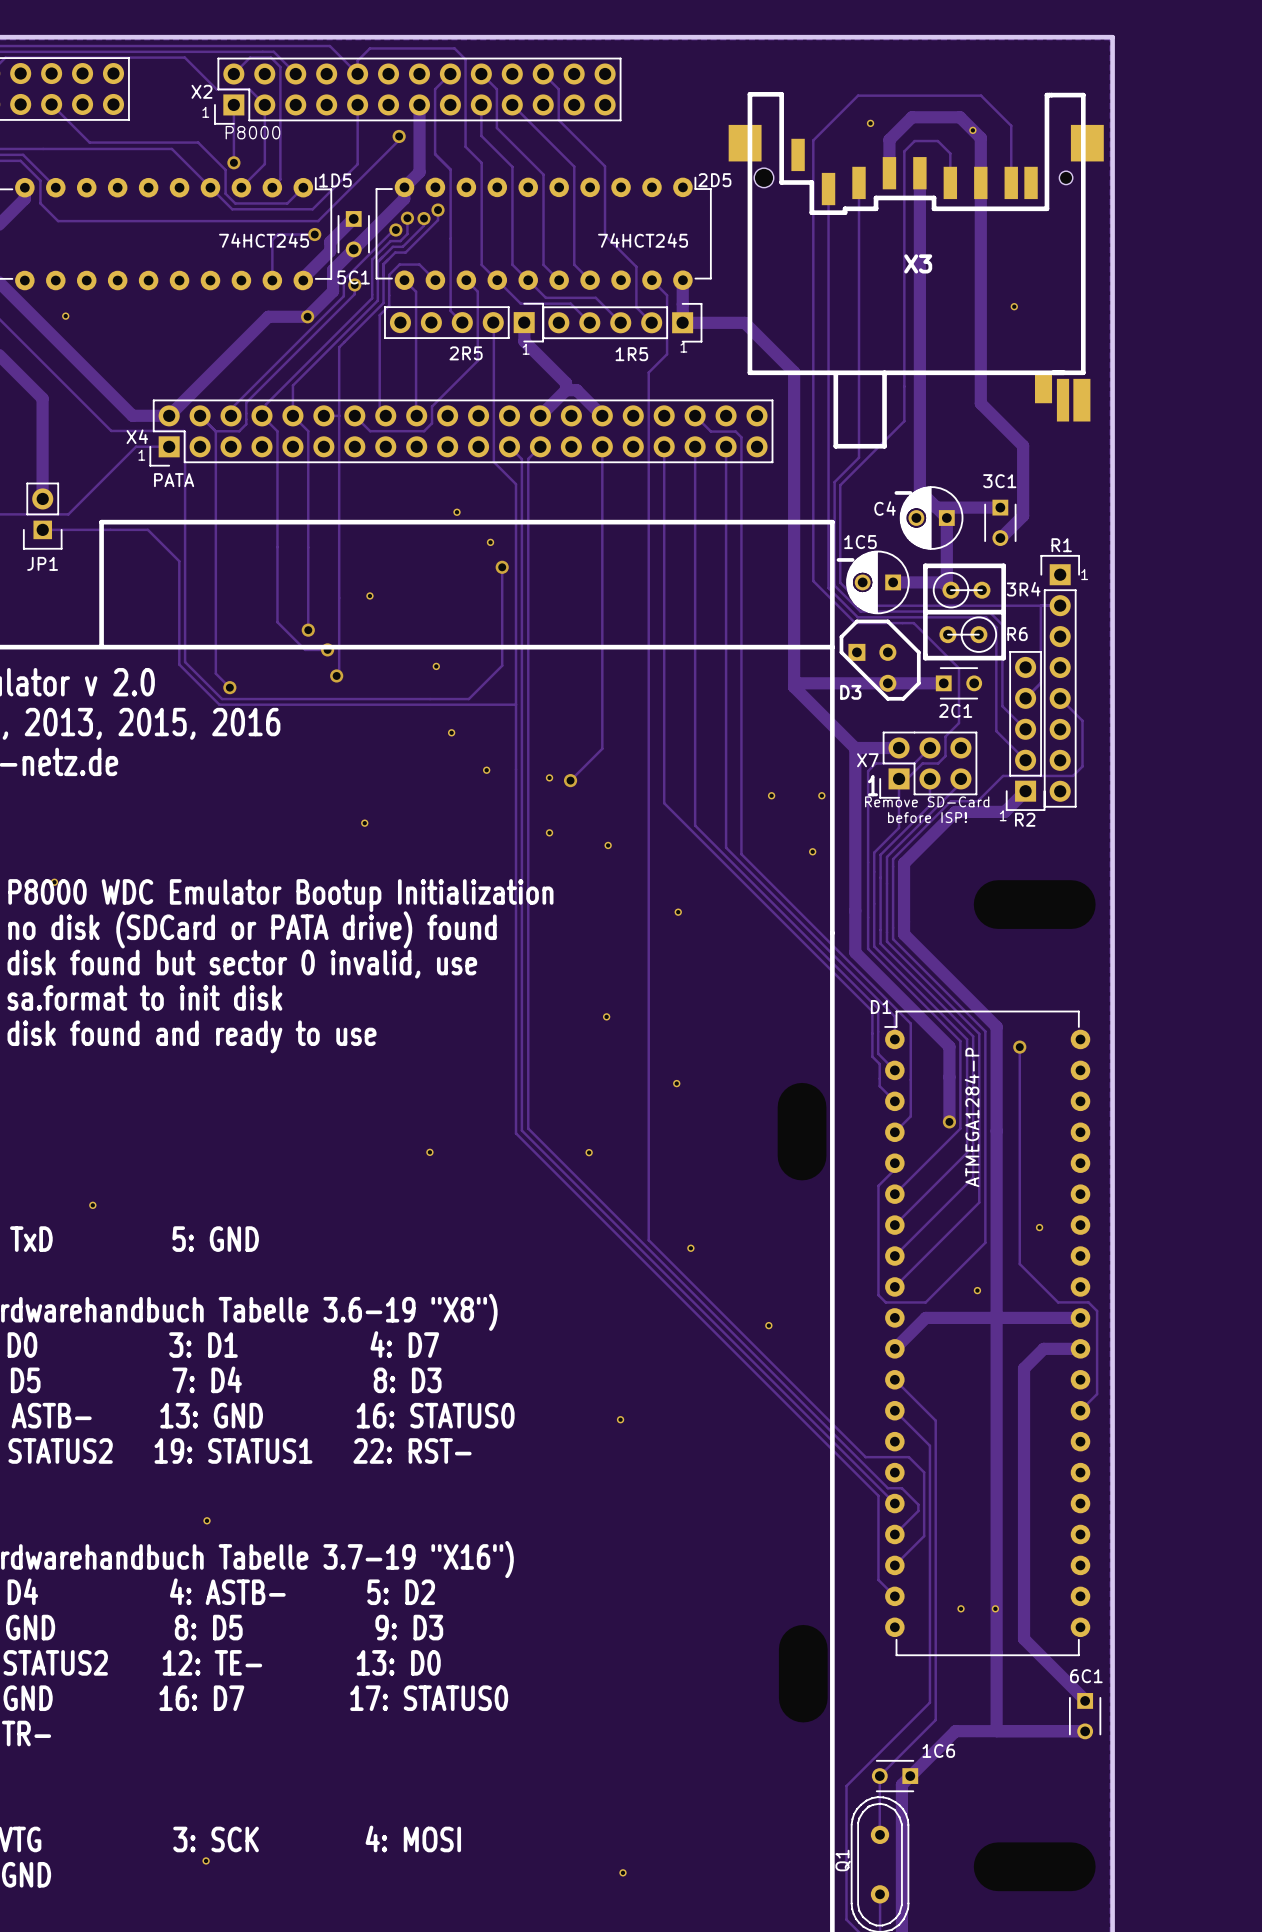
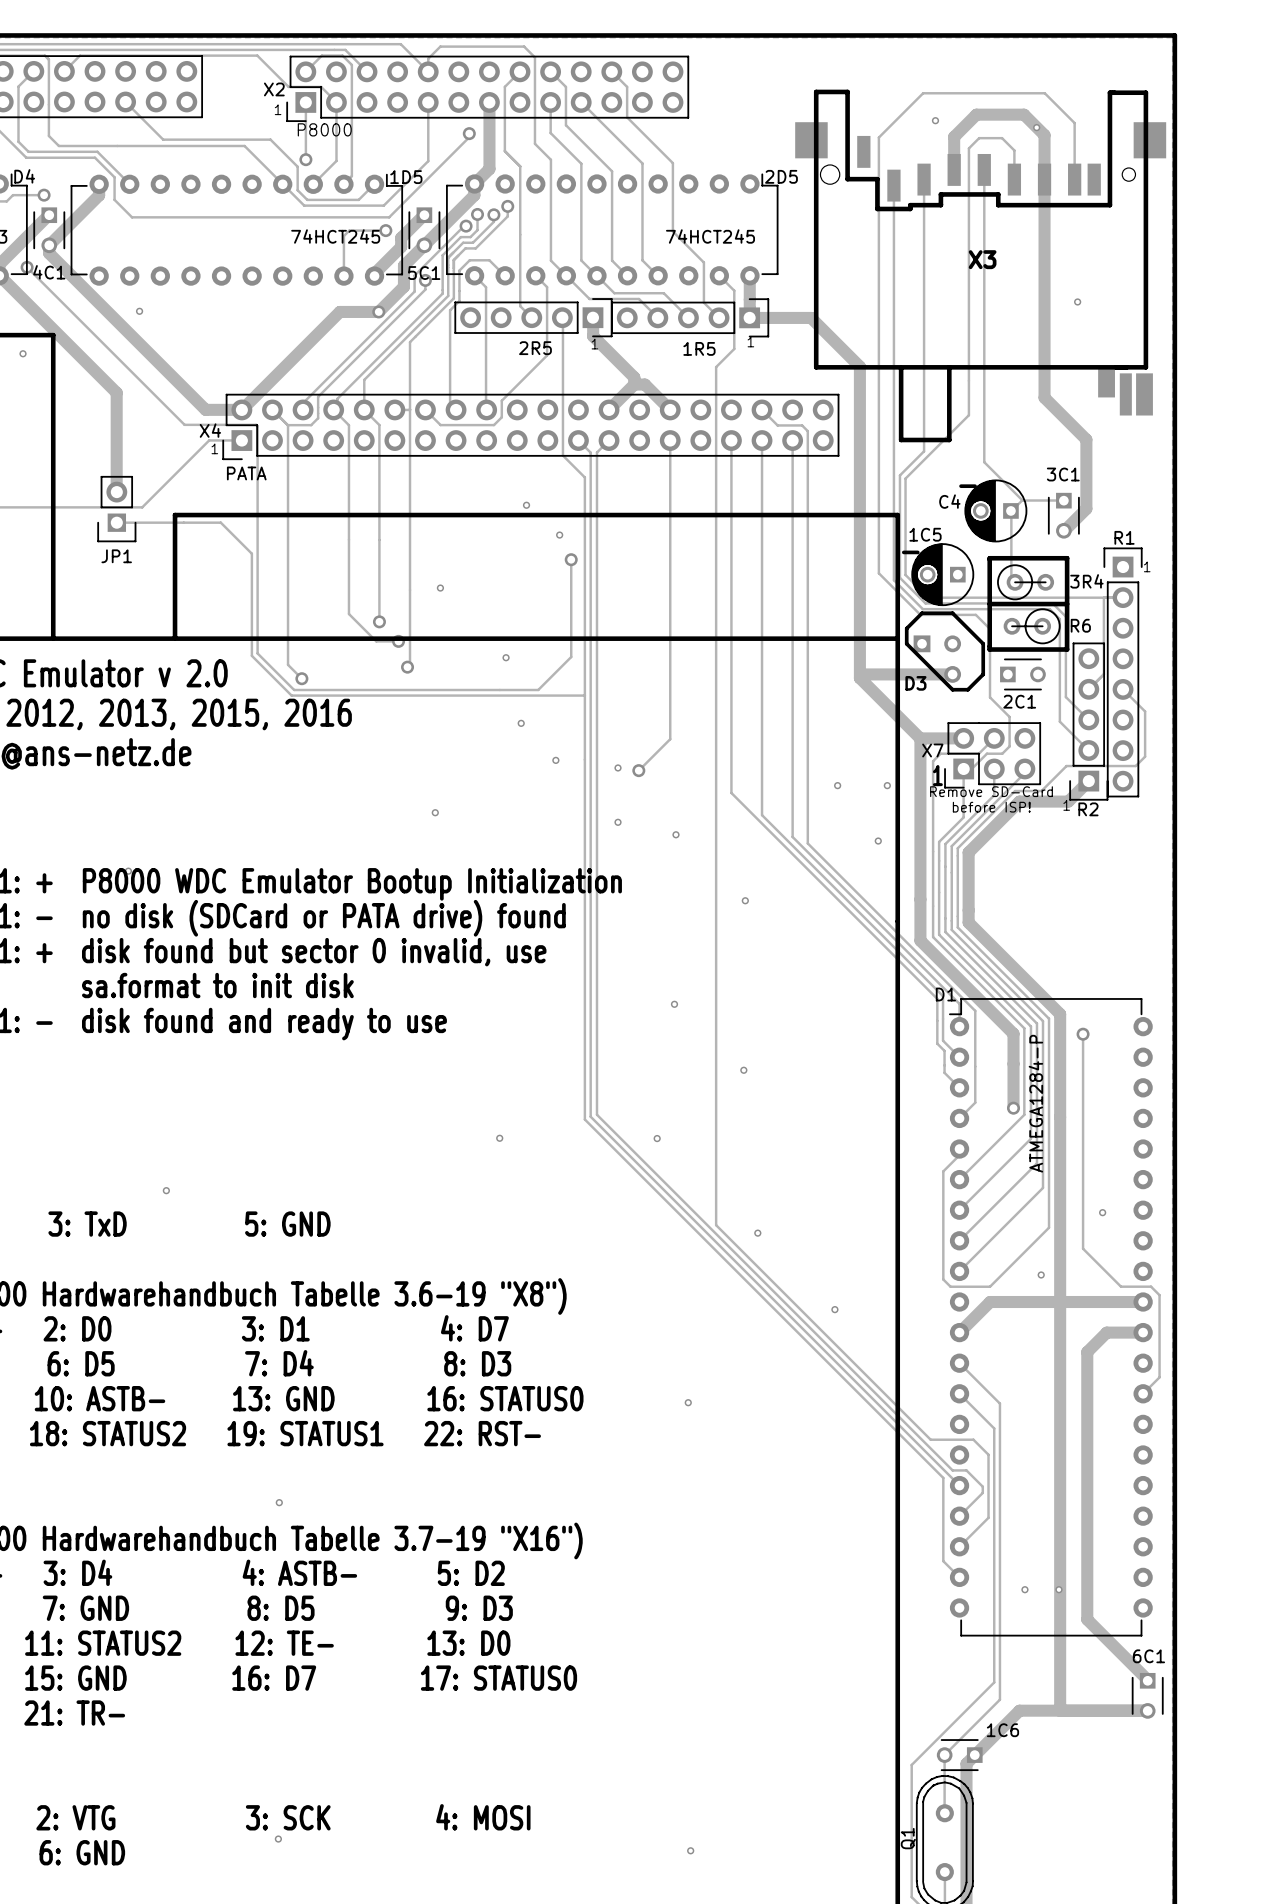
track width: thick (919, 173) (919, 468) -> thin (984, 169) (984, 462)
track: (919, 468) (919, 491) (946, 518) (946, 586) -> (984, 462) (1022, 500)
track: (936, 507) (1000, 507) -> (1011, 578) (1011, 511) (1022, 500) (1064, 500)
track: (893, 582) (943, 582) (947, 586) -> none
track: (911, 623) (913, 623) (958, 668) (958, 723) (945, 736) -> (975, 614) (990, 629) (990, 697) (1009, 716) (1009, 727)
track: (887, 683) (943, 683) -> none

